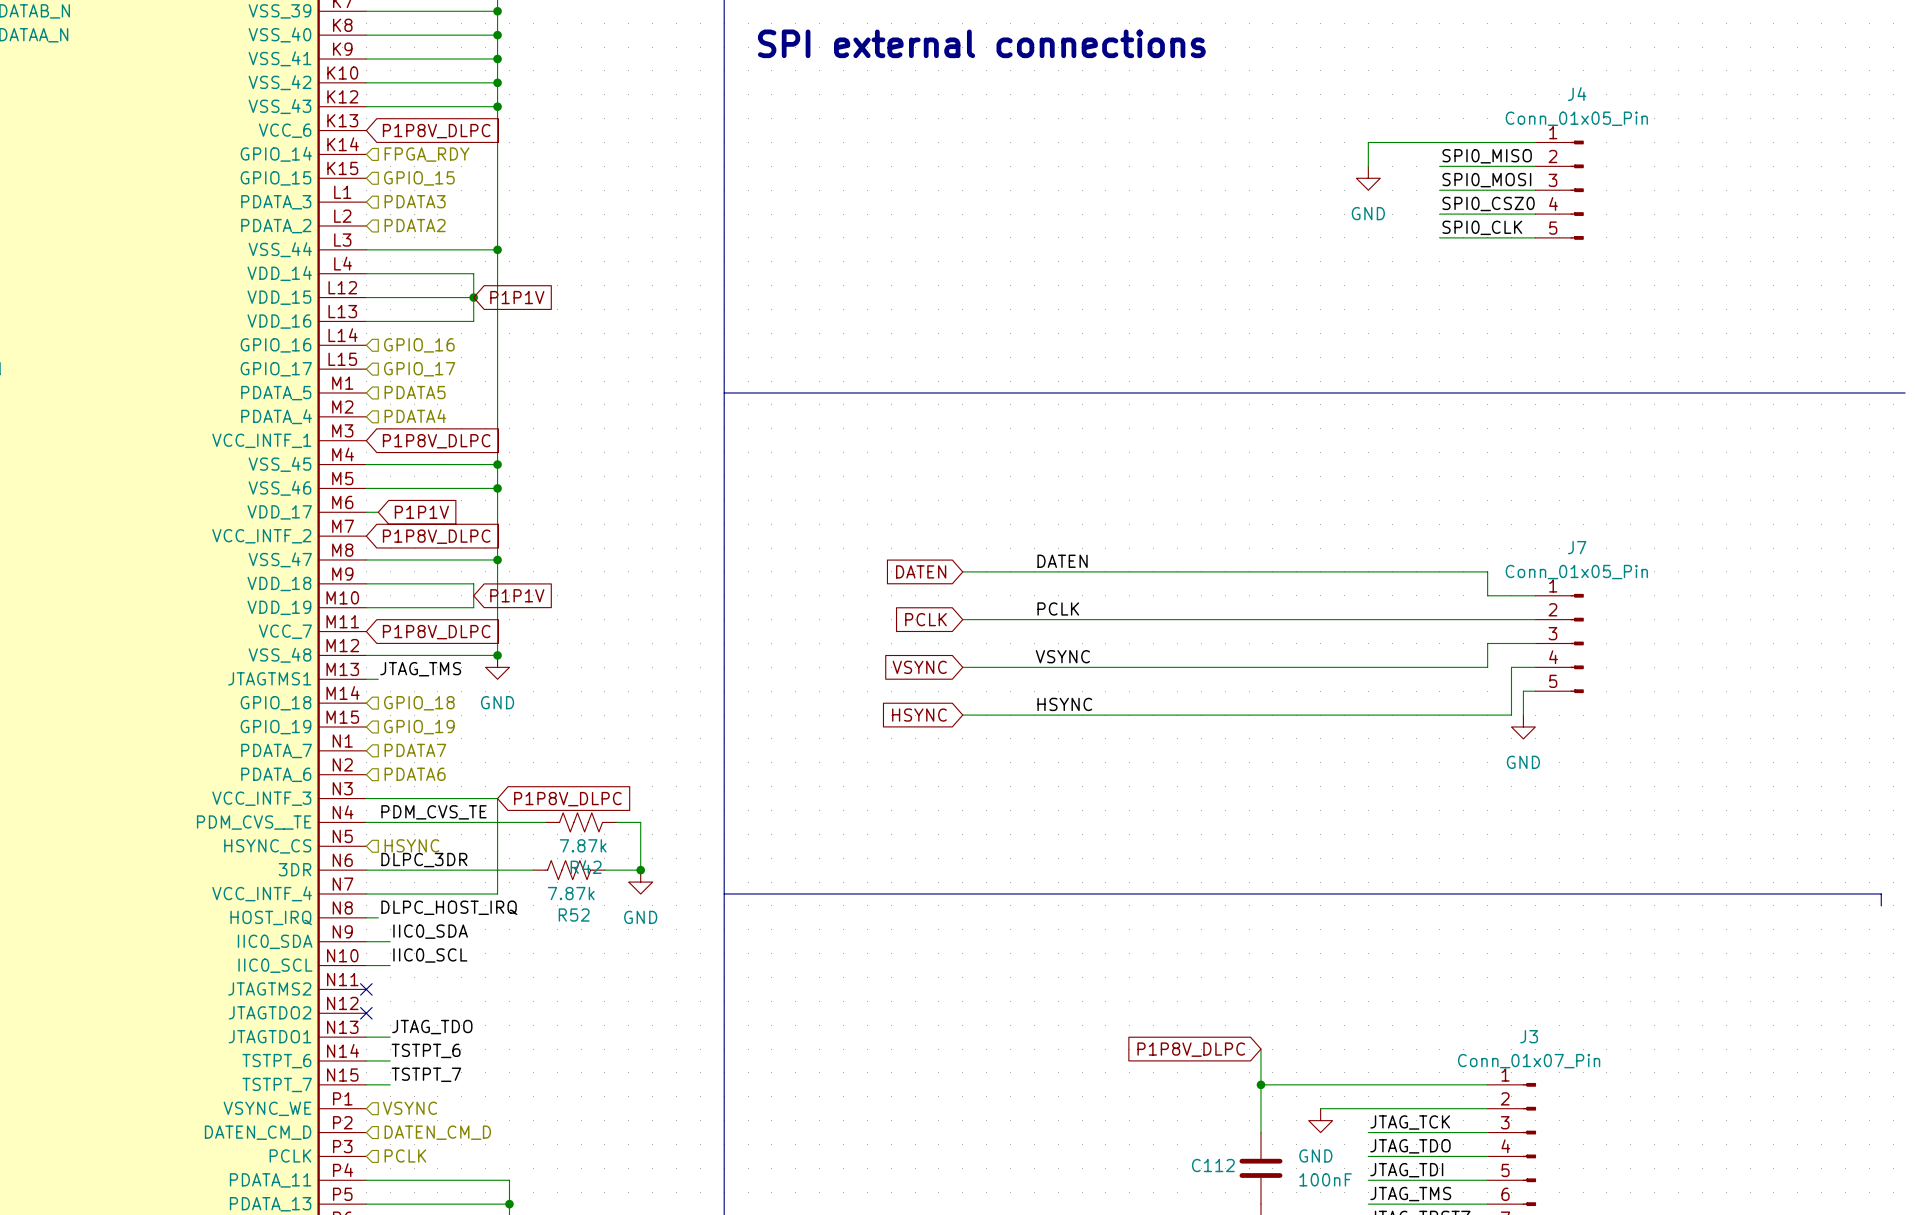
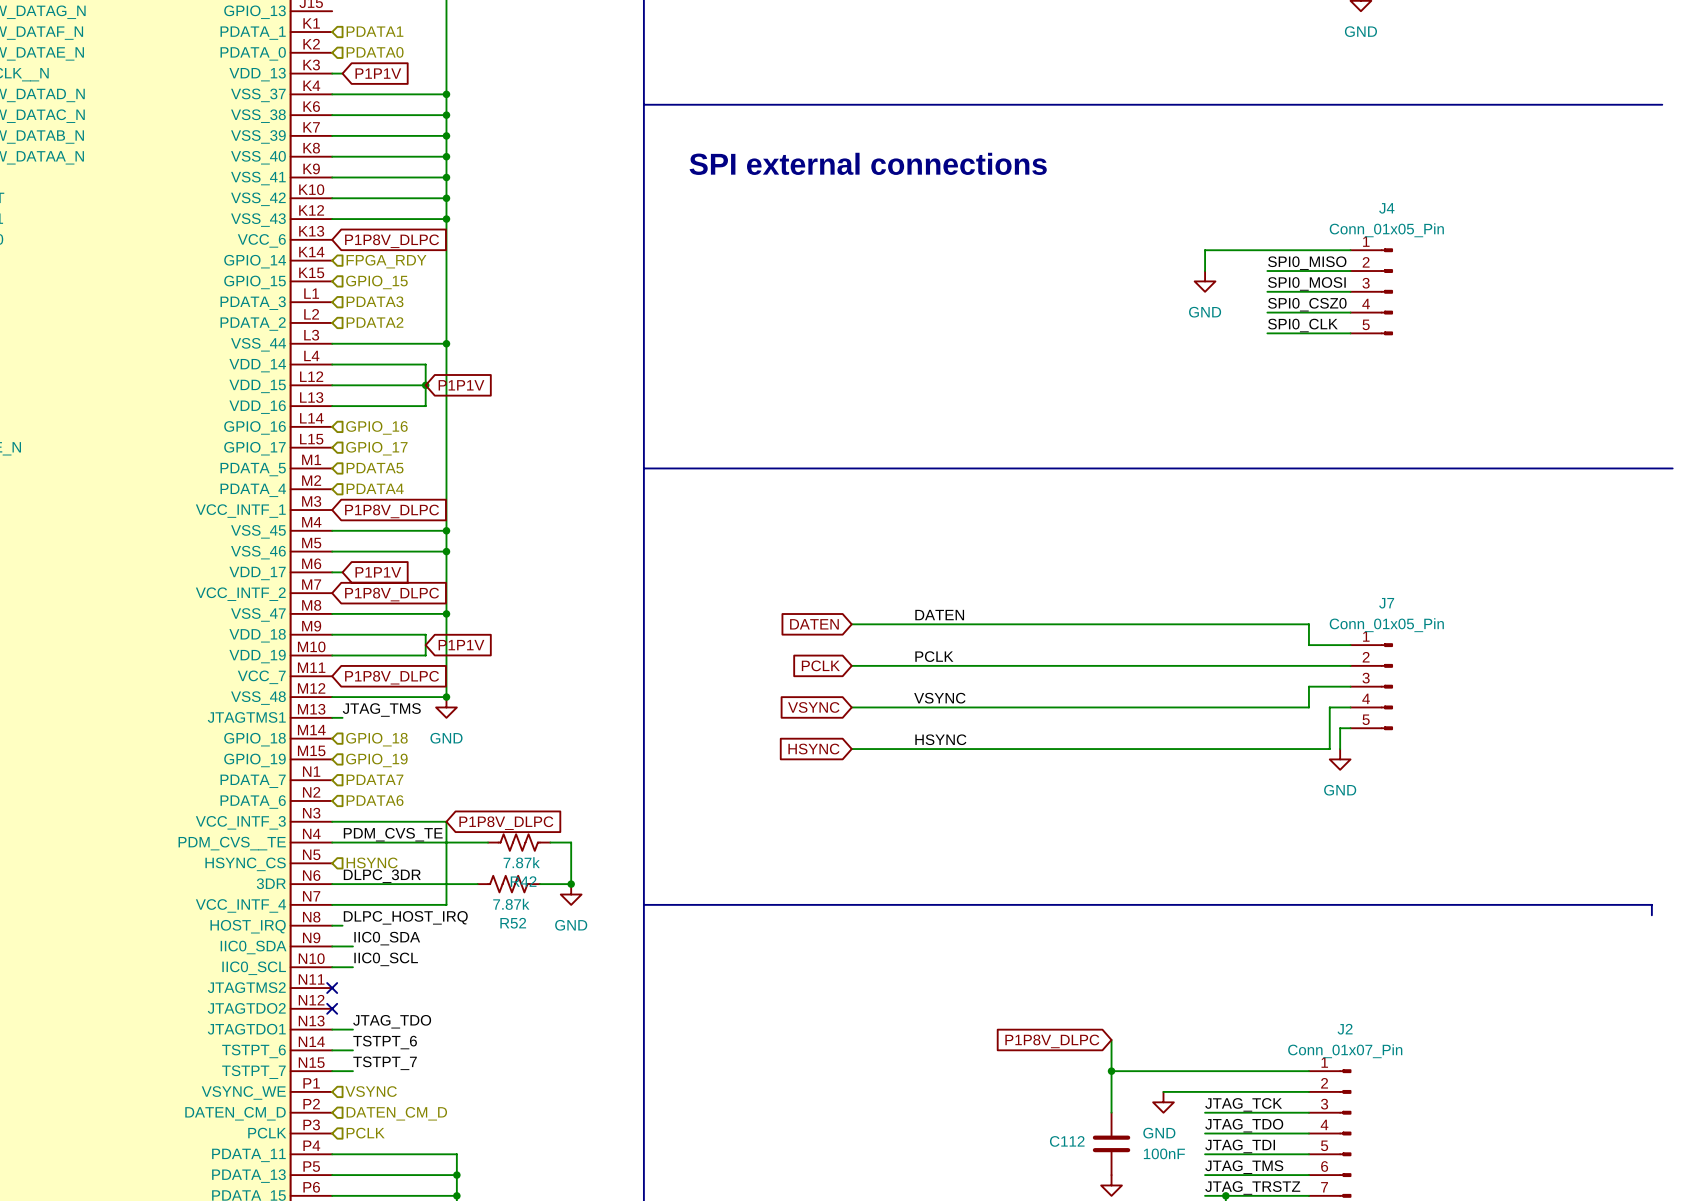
J3 name: J3 (1529, 1036) -> J2 (1345, 1029)

